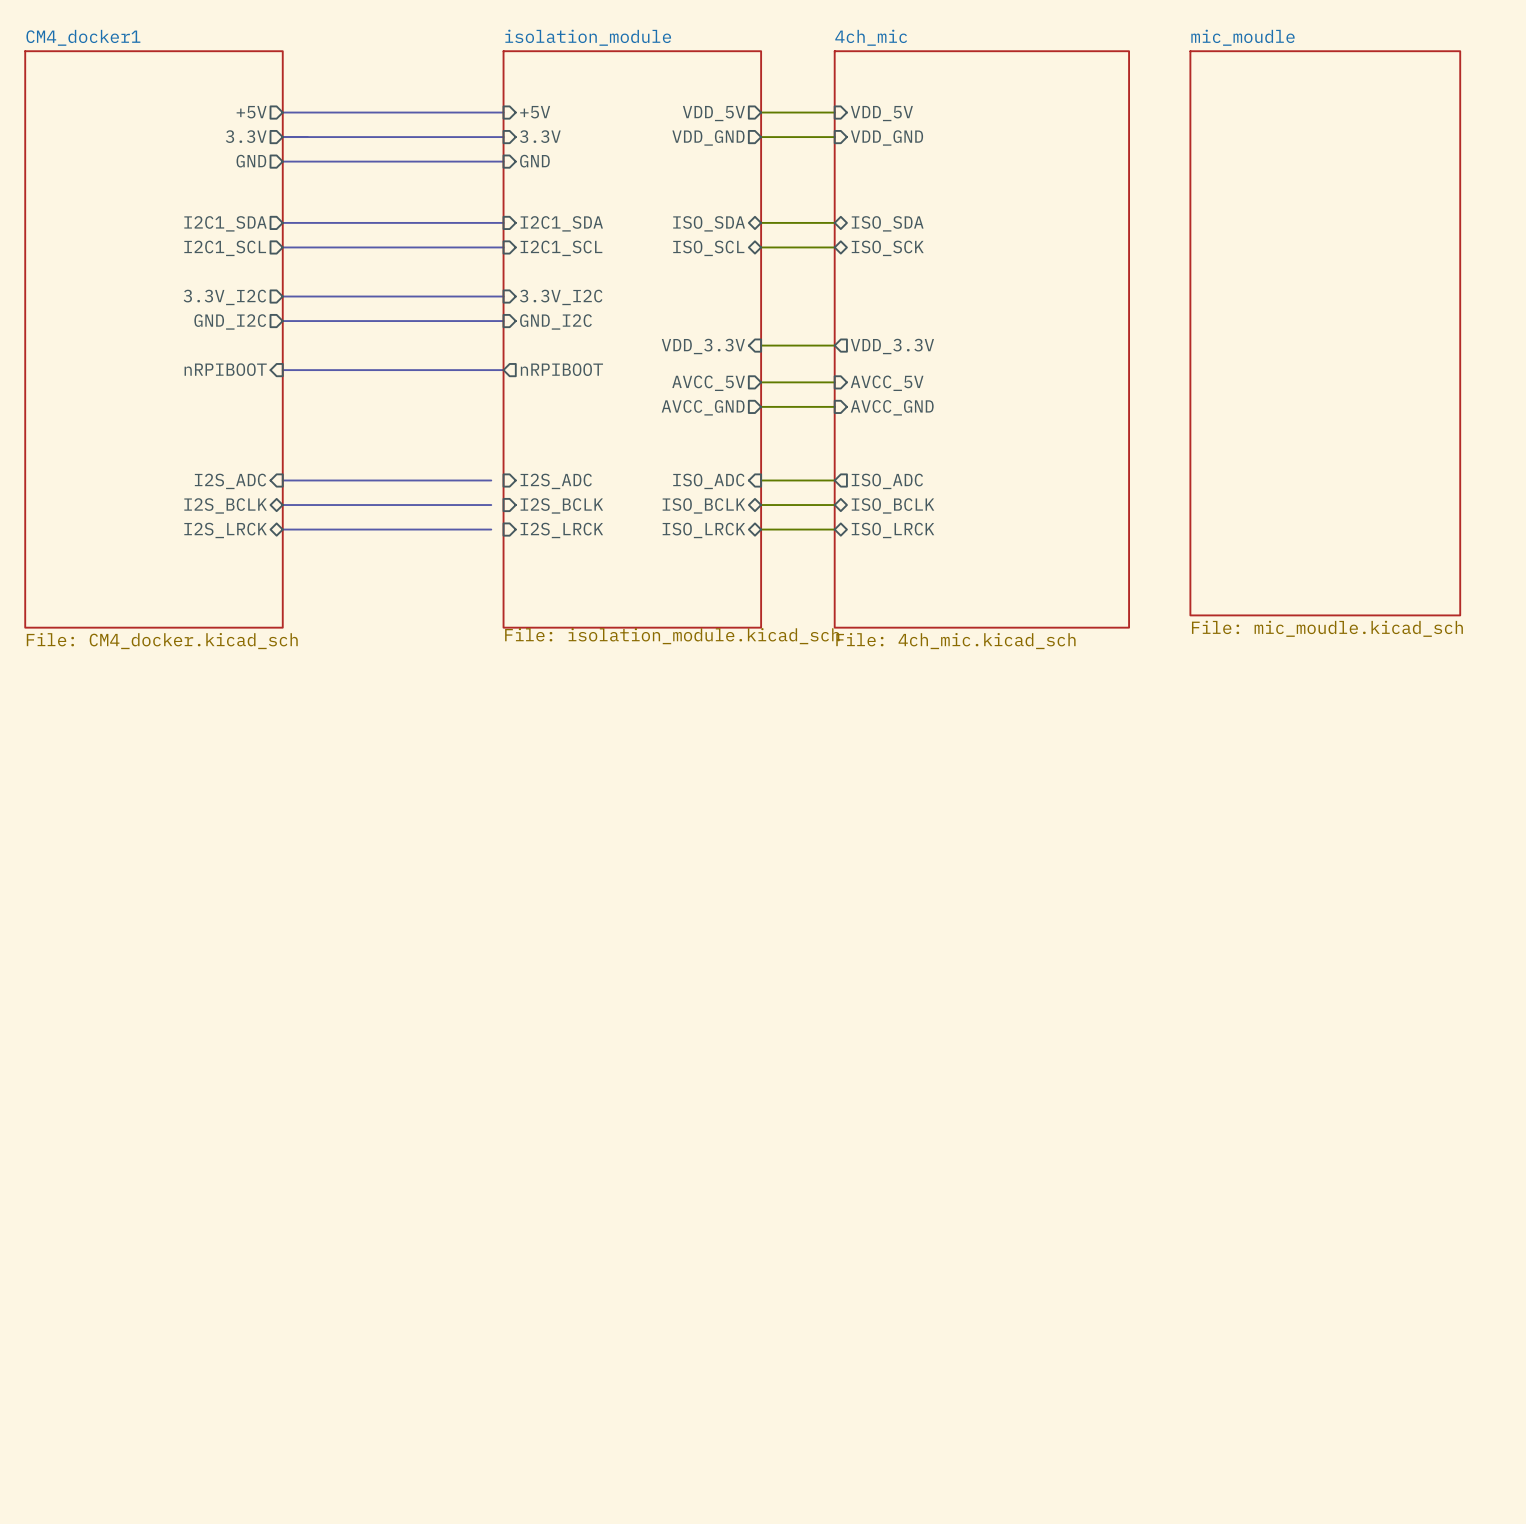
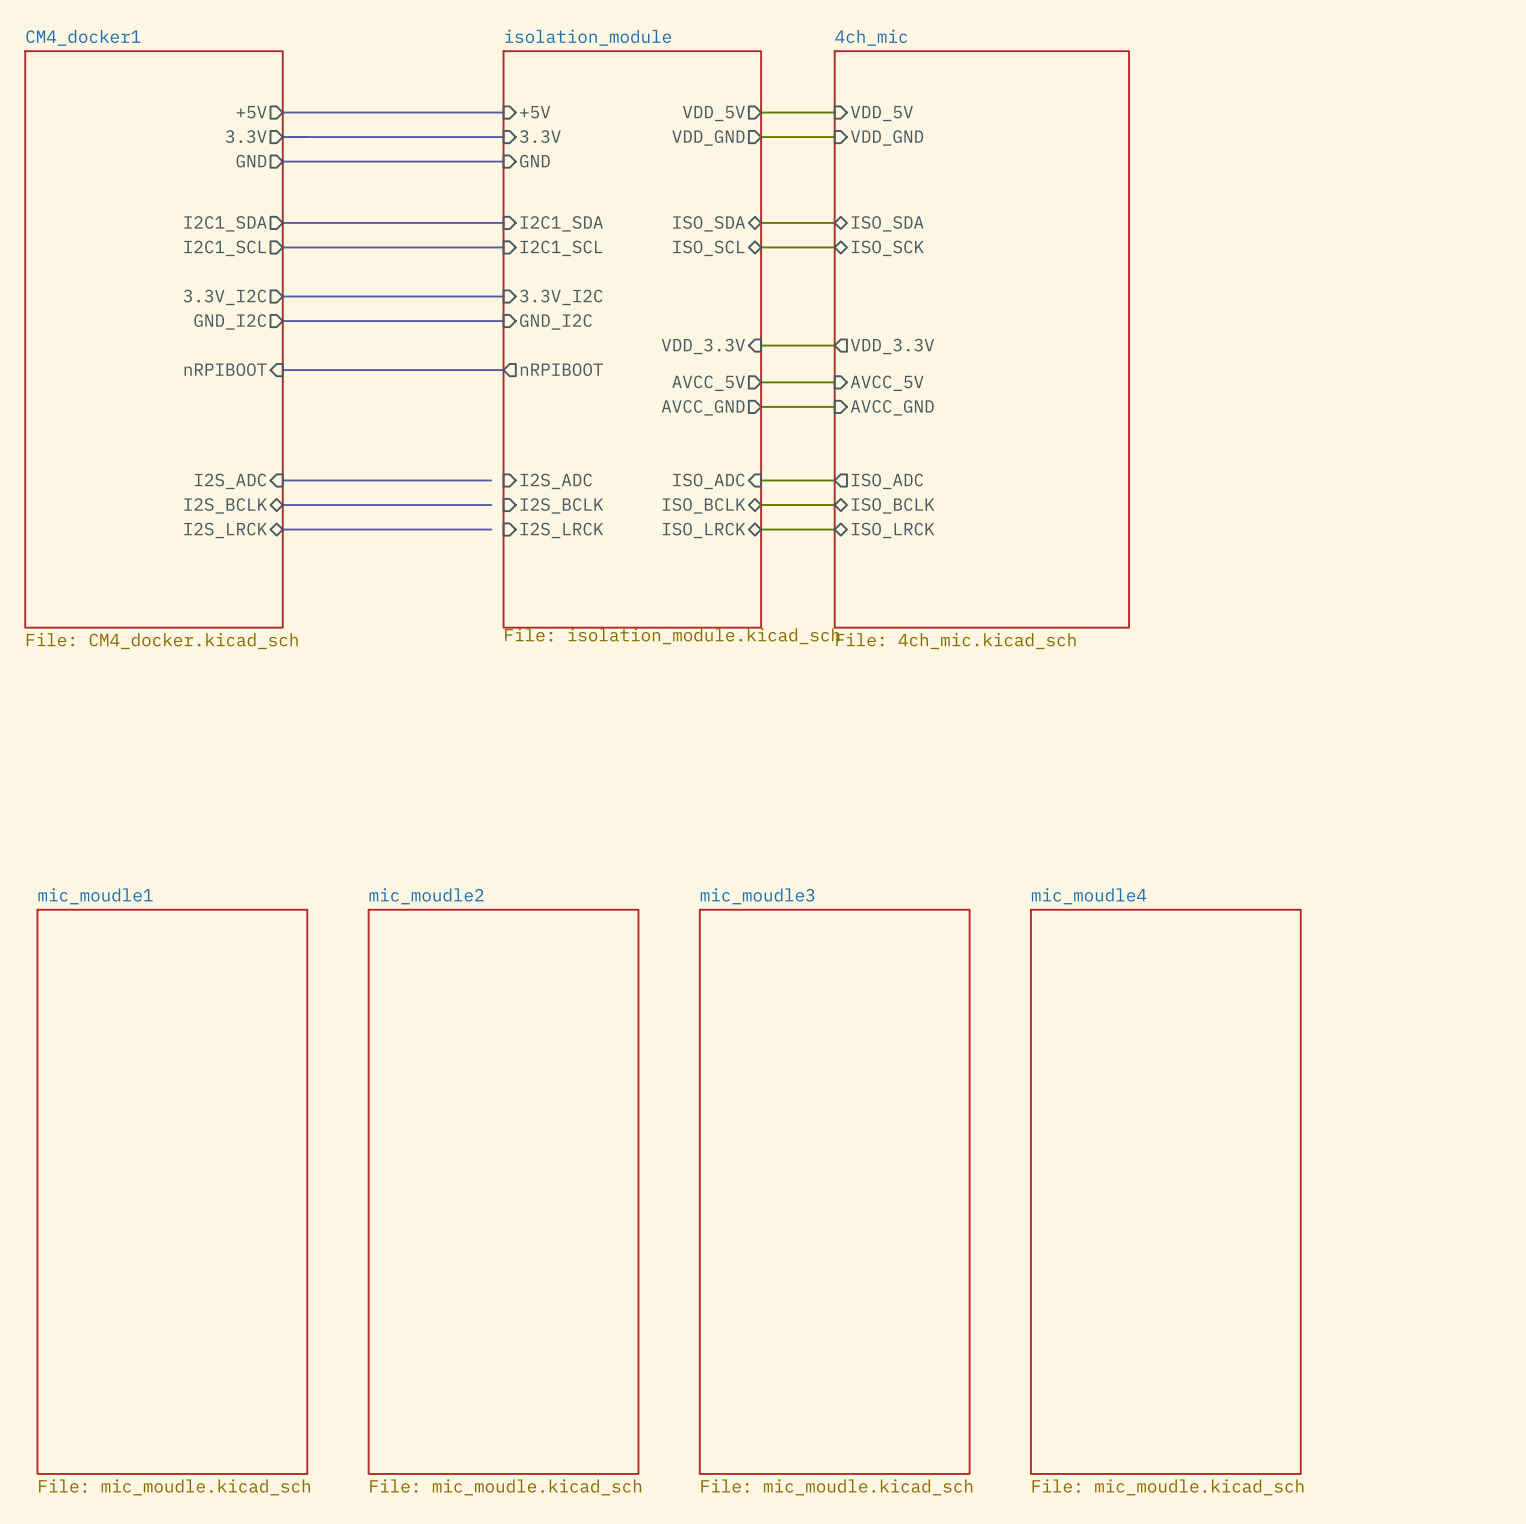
sheet mic_moudle: File: mic_moudle.kicad_sch (1325, 333) -> none
sheet mic_moudle1: none -> File: mic_moudle.kicad_sch (172, 1191)
sheet mic_moudle2: none -> File: mic_moudle.kicad_sch (503, 1191)
sheet mic_moudle3: none -> File: mic_moudle.kicad_sch (834, 1191)
sheet mic_moudle4: none -> File: mic_moudle.kicad_sch (1165, 1191)

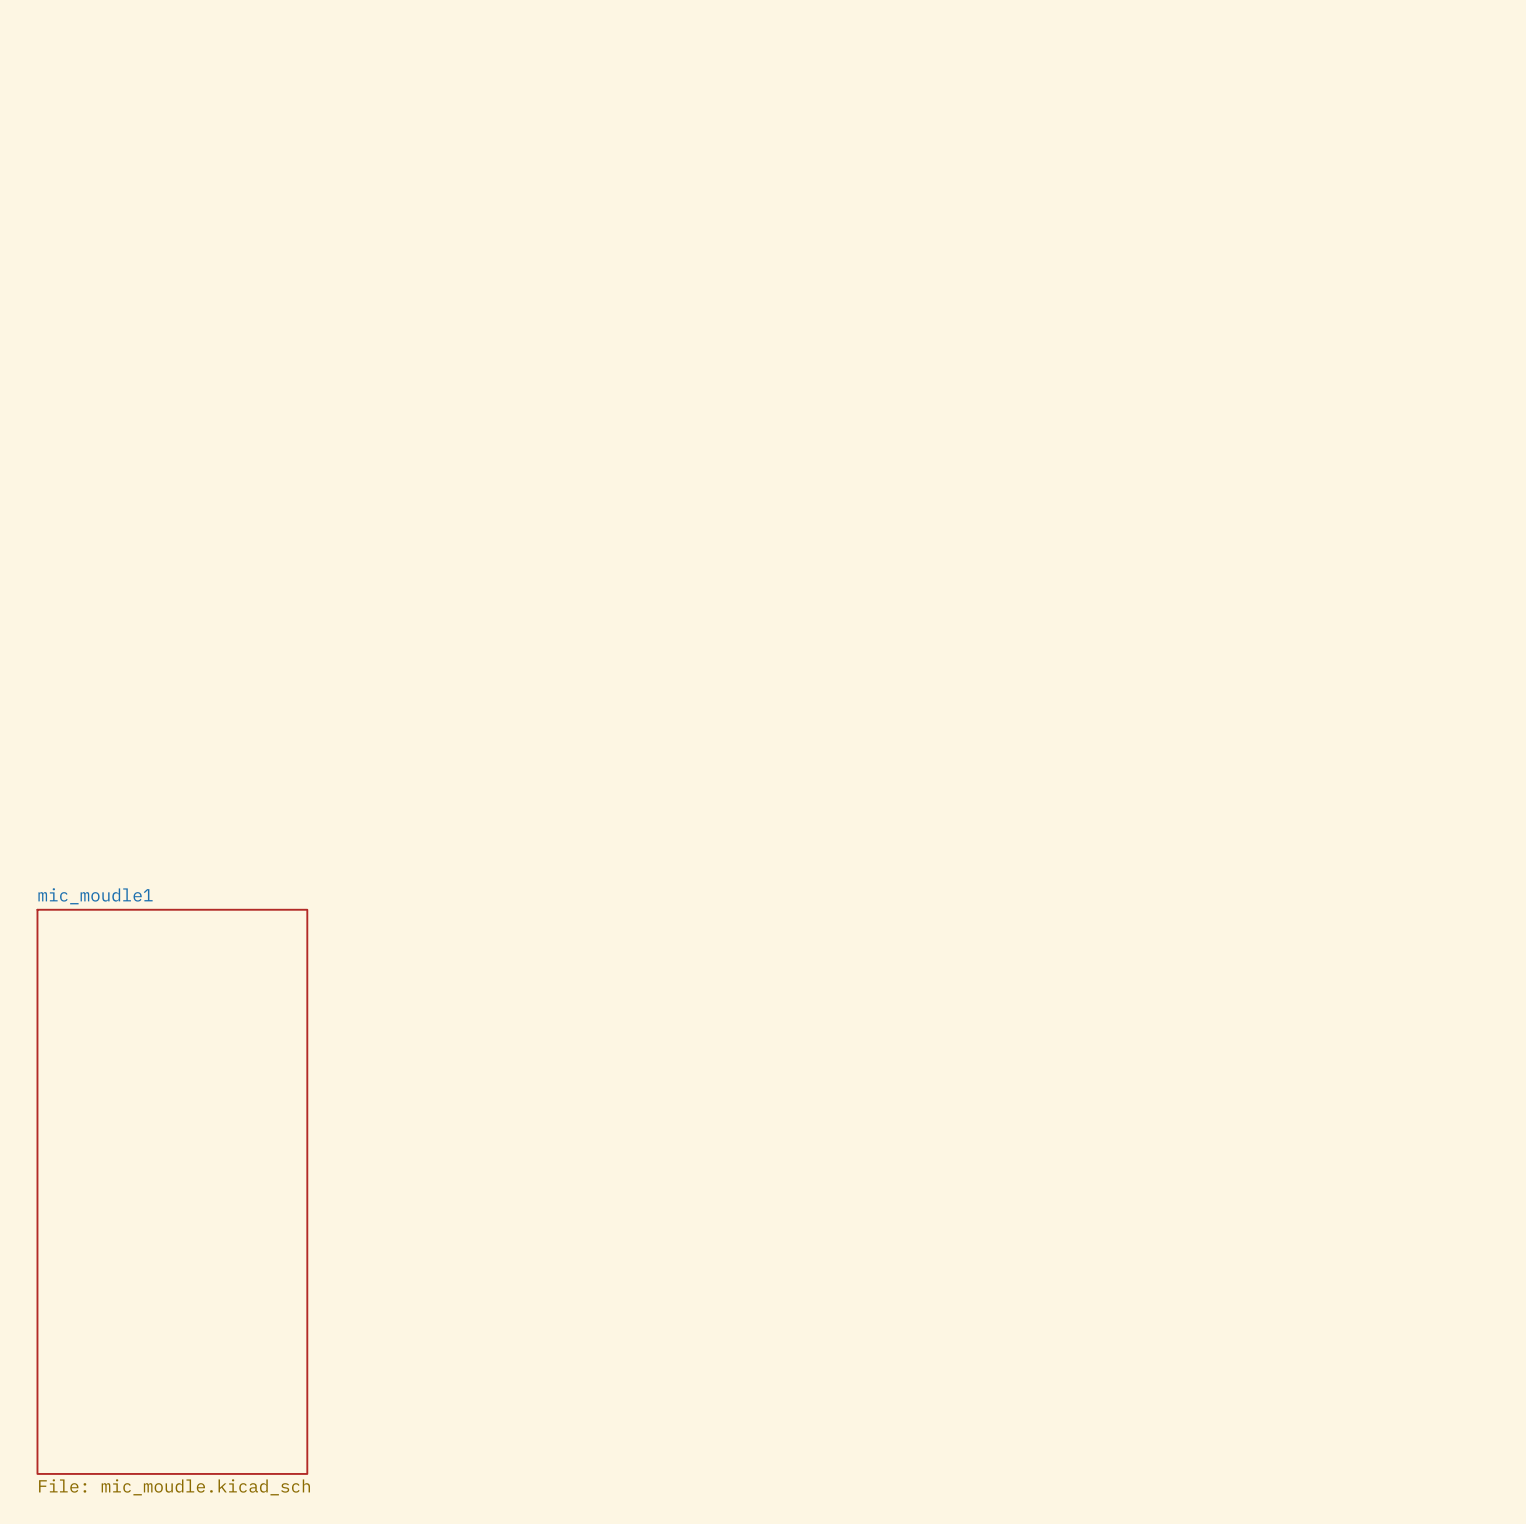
sheet pin: +5V (251, 112) -> none
line: (282, 112) (503, 112) -> none
sheet pin: +5V (535, 112) -> none
wire: (761, 112) (834, 112) -> none
sheet pin: VDD_5V (713, 113) -> none
sheet pin: VDD_5V (881, 113) -> none
sheet pin: 3.3V (246, 136) -> none
sheet pin: 3.3V (540, 136) -> none
line: (282, 137) (503, 137) -> none
sheet pin: VDD_GND (708, 137) -> none
wire: (761, 137) (834, 137) -> none
sheet pin: VDD_GND (887, 137) -> none
sheet pin: GND (251, 161) -> none
line: (282, 161) (503, 161) -> none
sheet pin: GND (534, 161) -> none
line: (282, 222) (503, 222) -> none
wire: (761, 222) (834, 222) -> none
sheet pin: I2C1_SDA (225, 223) -> none
sheet pin: I2C1_SDA (561, 223) -> none
sheet pin: ISO_SDA (709, 223) -> none
sheet pin: ISO_SDA (887, 223) -> none
line: (282, 247) (503, 247) -> none
wire: (761, 247) (834, 247) -> none
sheet pin: I2C1_SCL (225, 248) -> none
sheet pin: I2C1_SCL (561, 248) -> none
sheet pin: ISO_SCL (708, 248) -> none
sheet pin: ISO_SCK (887, 248) -> none
line: (282, 296) (503, 296) -> none
sheet pin: 3.3V_I2C (224, 297) -> none
sheet pin: 3.3V_I2C (561, 297) -> none
sheet pin: GND_I2C (230, 321) -> none
line: (282, 321) (503, 321) -> none
sheet pin: GND_I2C (555, 321) -> none
sheet CM4_docker1: File: CM4_docker.kicad_sch (153, 339) -> none
sheet isolation_module: File: isolation_module.kicad_sch (632, 339) -> none
sheet 4ch_mic: File: 4ch_mic.kicad_sch (981, 339) -> none
wire: (761, 345) (834, 345) -> none
sheet pin: VDD_3.3V (703, 346) -> none
sheet pin: VDD_3.3V (892, 346) -> none
sheet pin: nRPIBOOT (225, 369) -> none
sheet pin: nRPIBOOT (561, 369) -> none
line: (282, 370) (503, 370) -> none
wire: (761, 382) (834, 382) -> none
sheet pin: AVCC_5V (708, 383) -> none
sheet pin: AVCC_5V (887, 383) -> none
wire: (761, 406) (834, 406) -> none
sheet pin: AVCC_GND (703, 407) -> none
sheet pin: AVCC_GND (892, 407) -> none
line: (282, 480) (491, 480) -> none
wire: (761, 480) (834, 480) -> none
sheet pin: I2S_ADC (230, 481) -> none
sheet pin: I2S_ADC (556, 481) -> none
sheet pin: ISO_ADC (708, 481) -> none
sheet pin: ISO_ADC (887, 481) -> none
sheet pin: I2S_BCLK (225, 505) -> none
line: (282, 505) (491, 505) -> none
sheet pin: I2S_BCLK (561, 505) -> none
sheet pin: ISO_BCLK (703, 505) -> none
wire: (761, 505) (834, 505) -> none
sheet pin: ISO_BCLK (892, 505) -> none
line: (282, 529) (491, 529) -> none
wire: (761, 529) (834, 529) -> none
sheet pin: I2S_LRCK (225, 530) -> none
sheet pin: I2S_LRCK (561, 530) -> none
sheet pin: ISO_LRCK (703, 530) -> none
sheet pin: ISO_LRCK (892, 530) -> none
sheet mic_moudle2: File: mic_moudle.kicad_sch (503, 1191) -> none
sheet mic_moudle3: File: mic_moudle.kicad_sch (834, 1191) -> none
sheet mic_moudle4: File: mic_moudle.kicad_sch (1165, 1191) -> none

